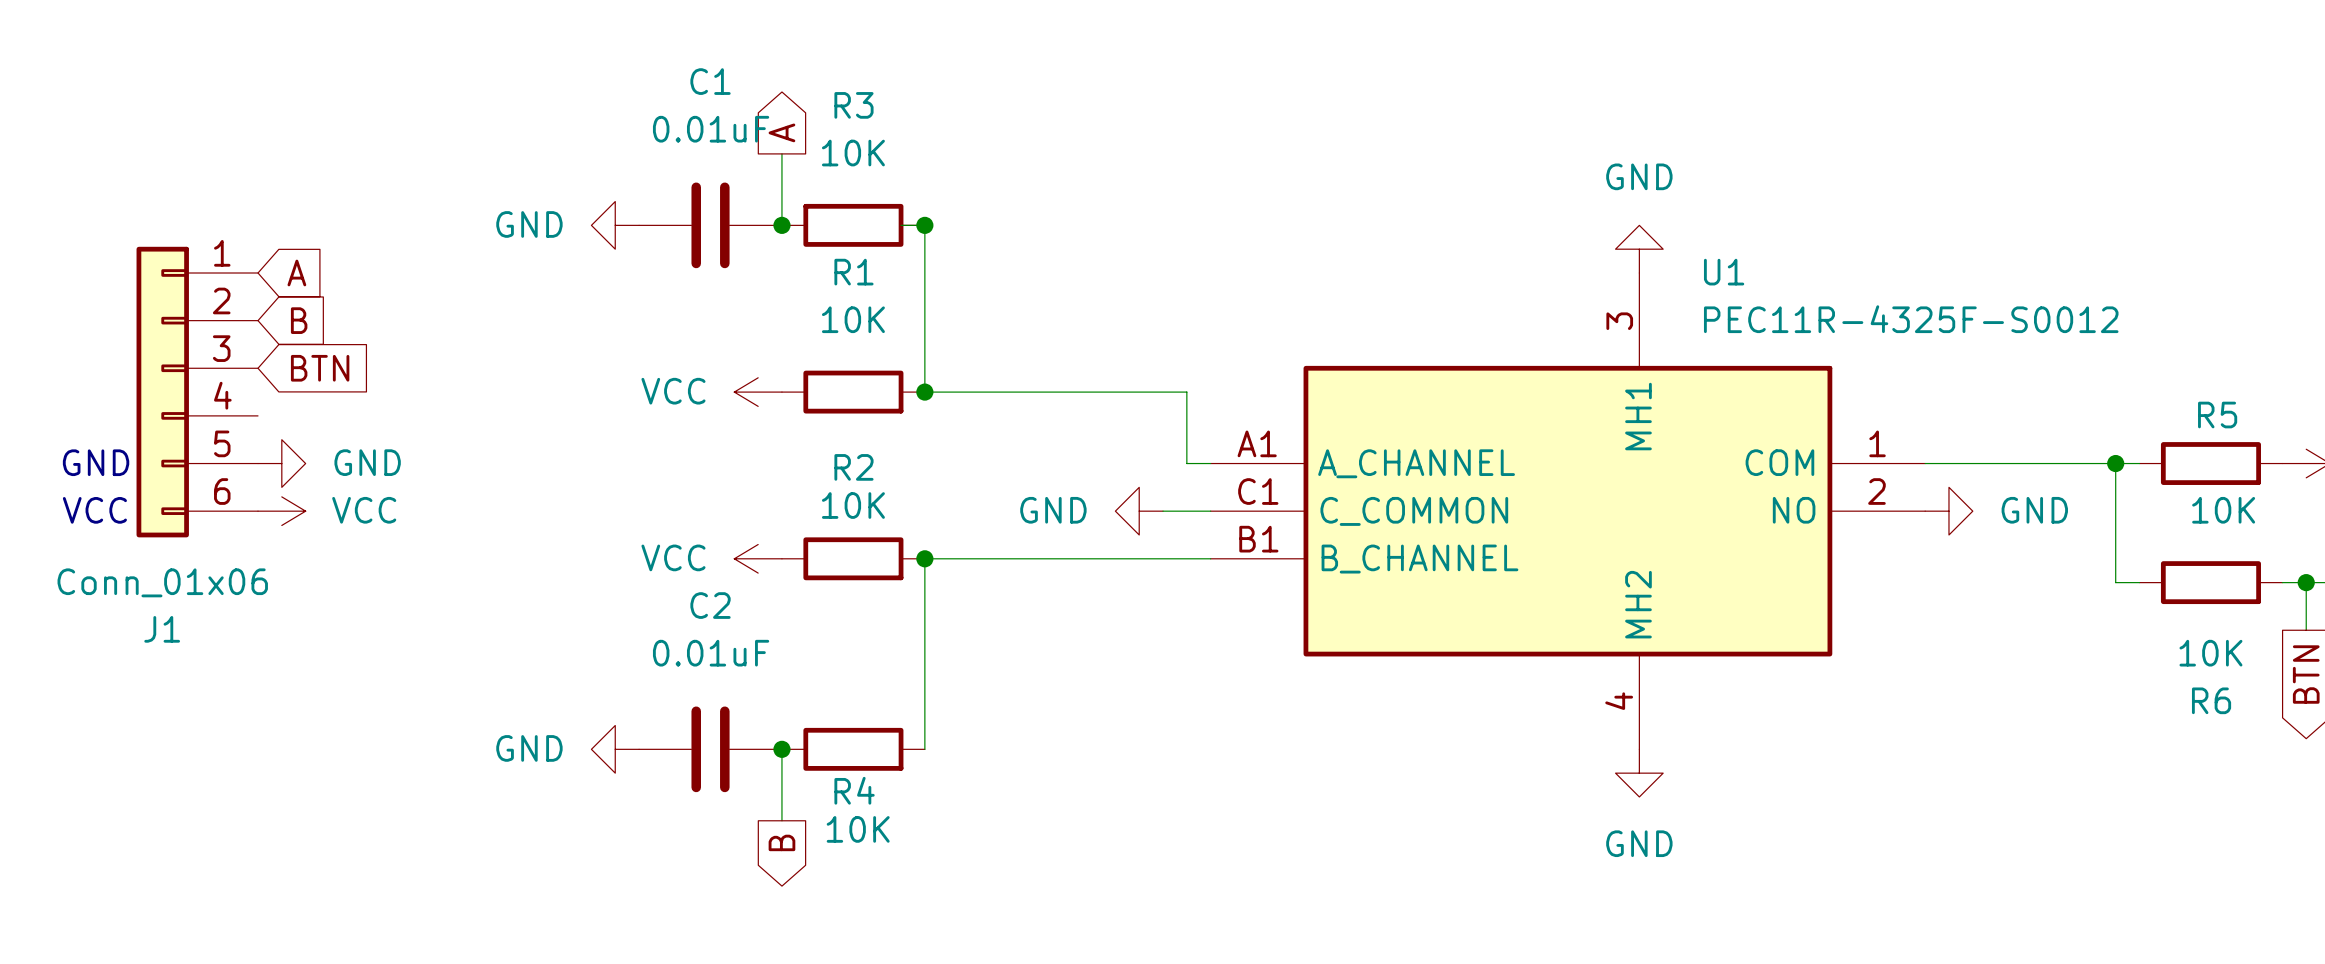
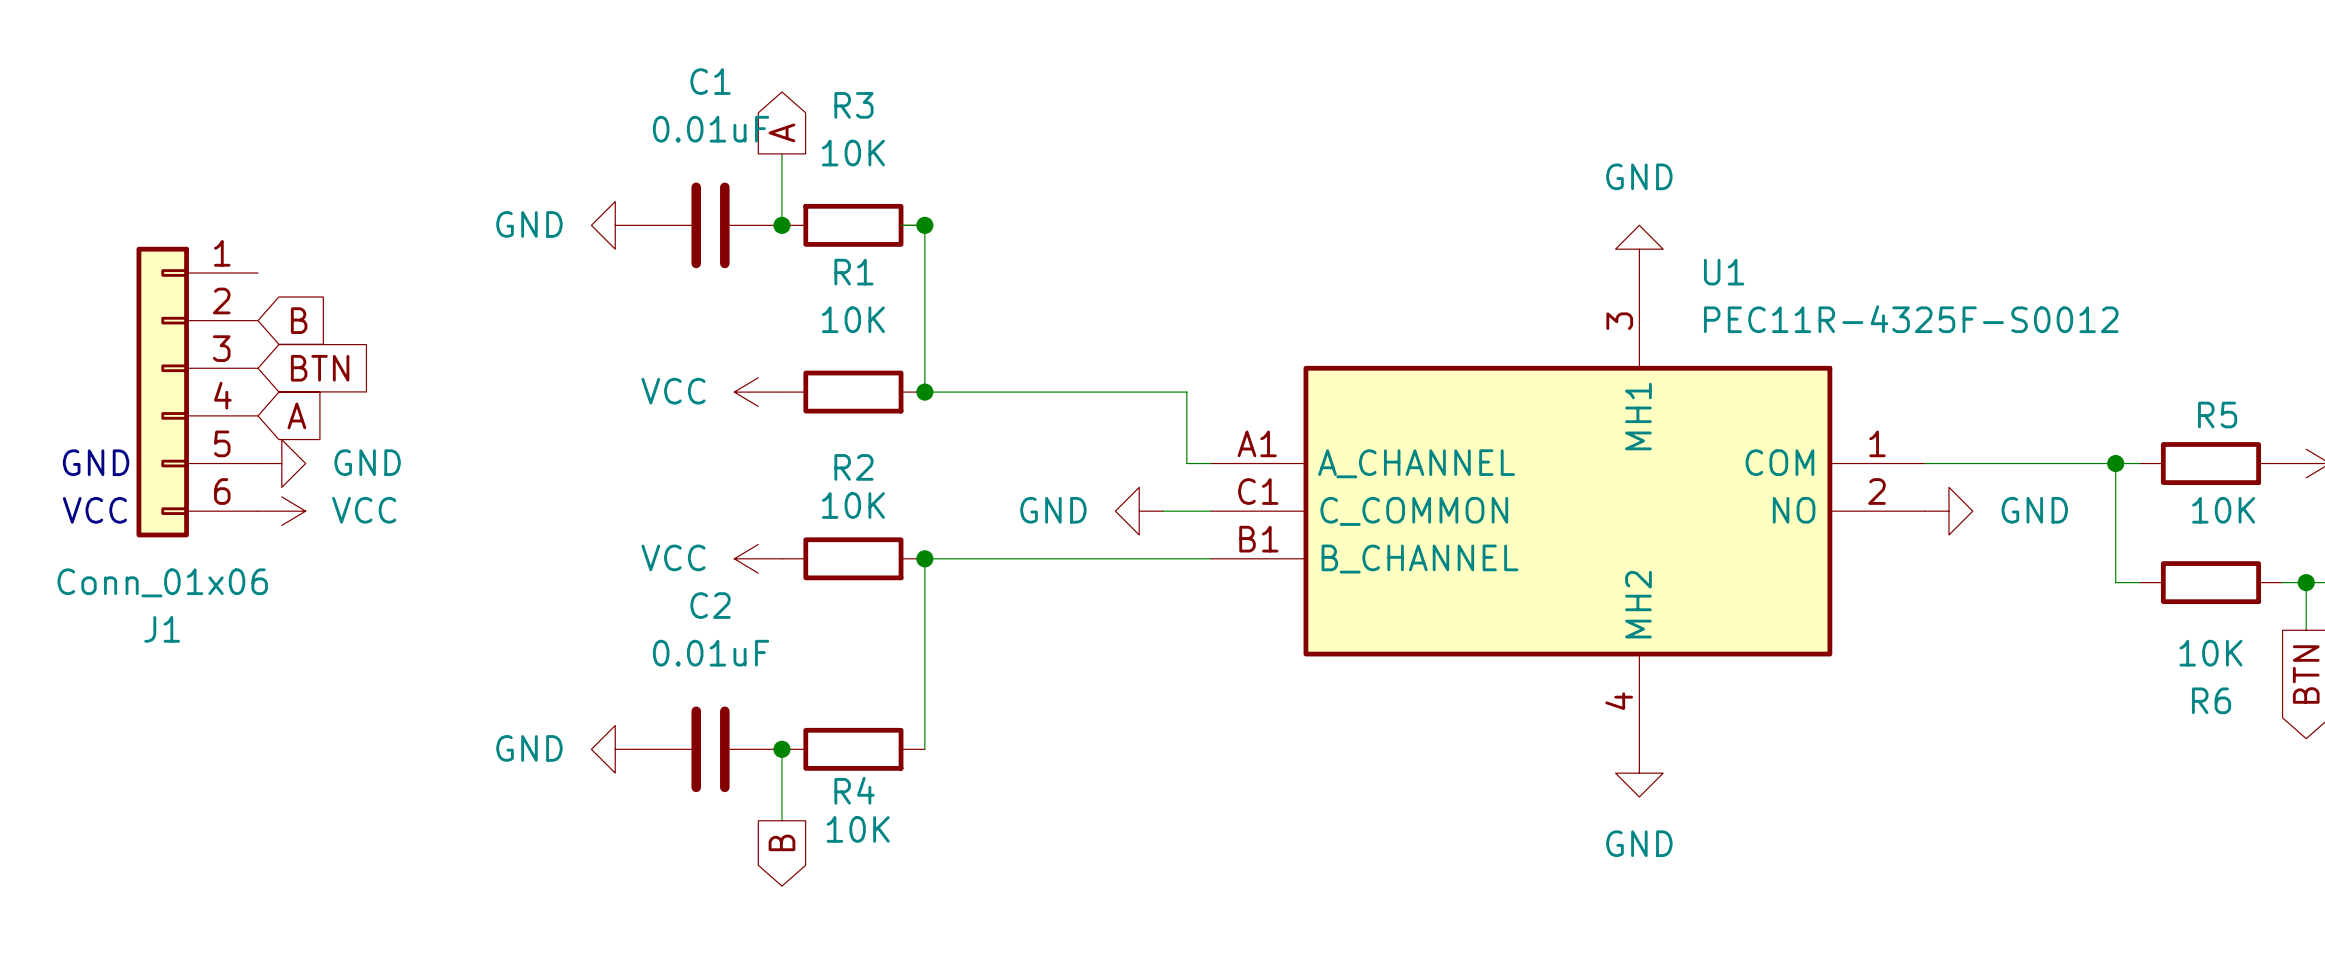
global label position: A (296, 273) -> A (296, 415)

